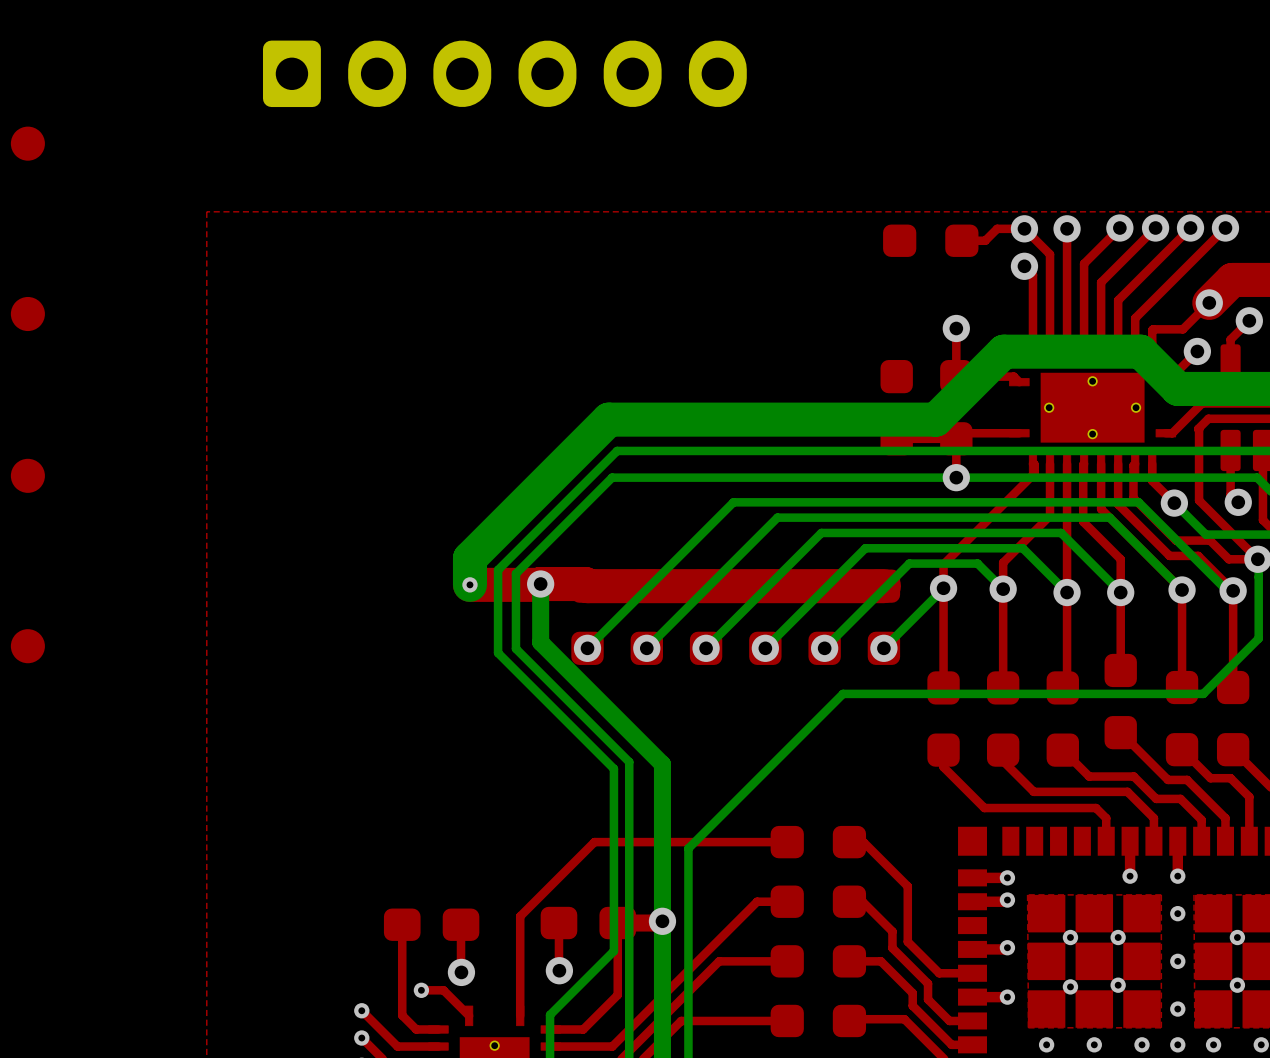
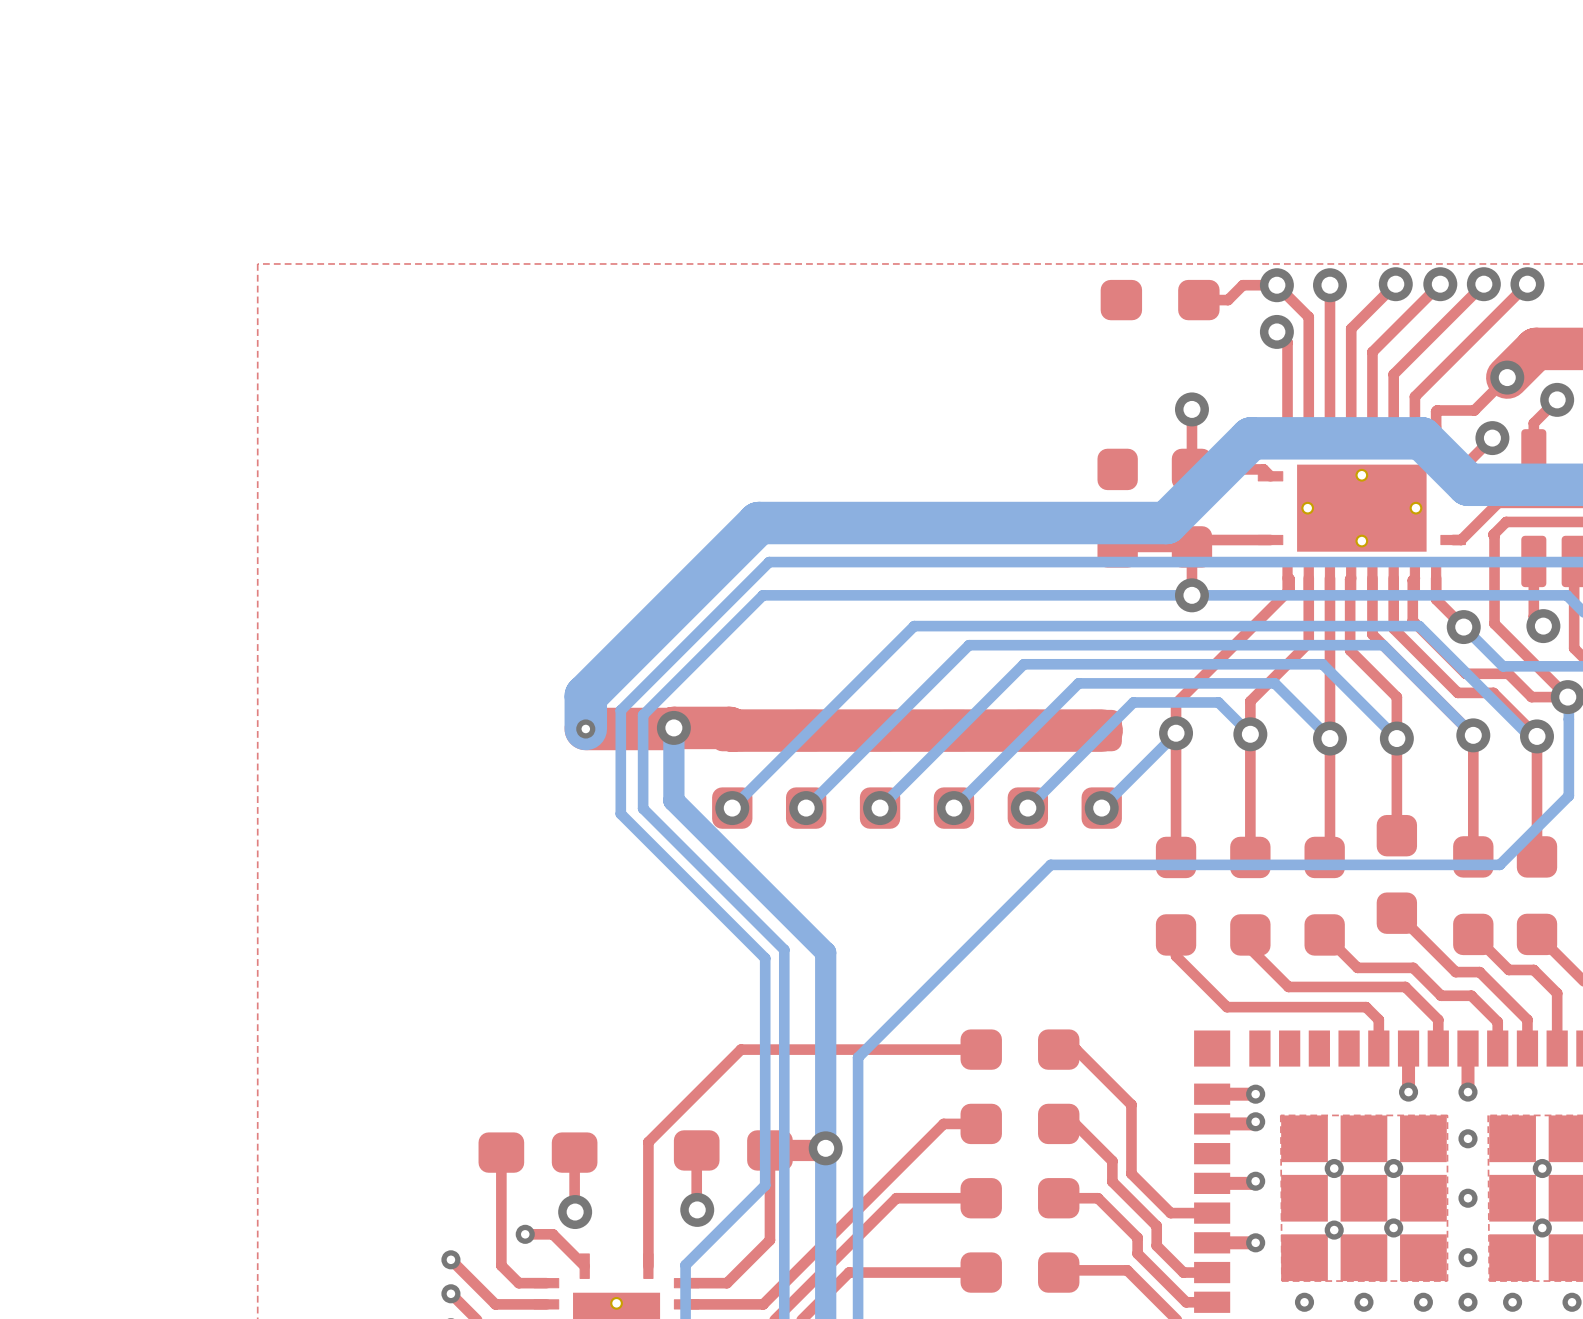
part: (504, 73) -> none
part: (27, 143) -> none
part: (27, 314) -> none
part: (27, 475) -> none
part: (27, 646) -> none

